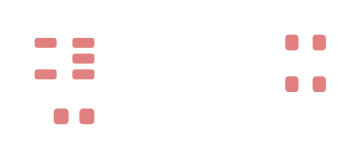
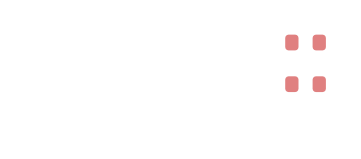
part: (64, 58) -> none
part: (73, 116) -> none

